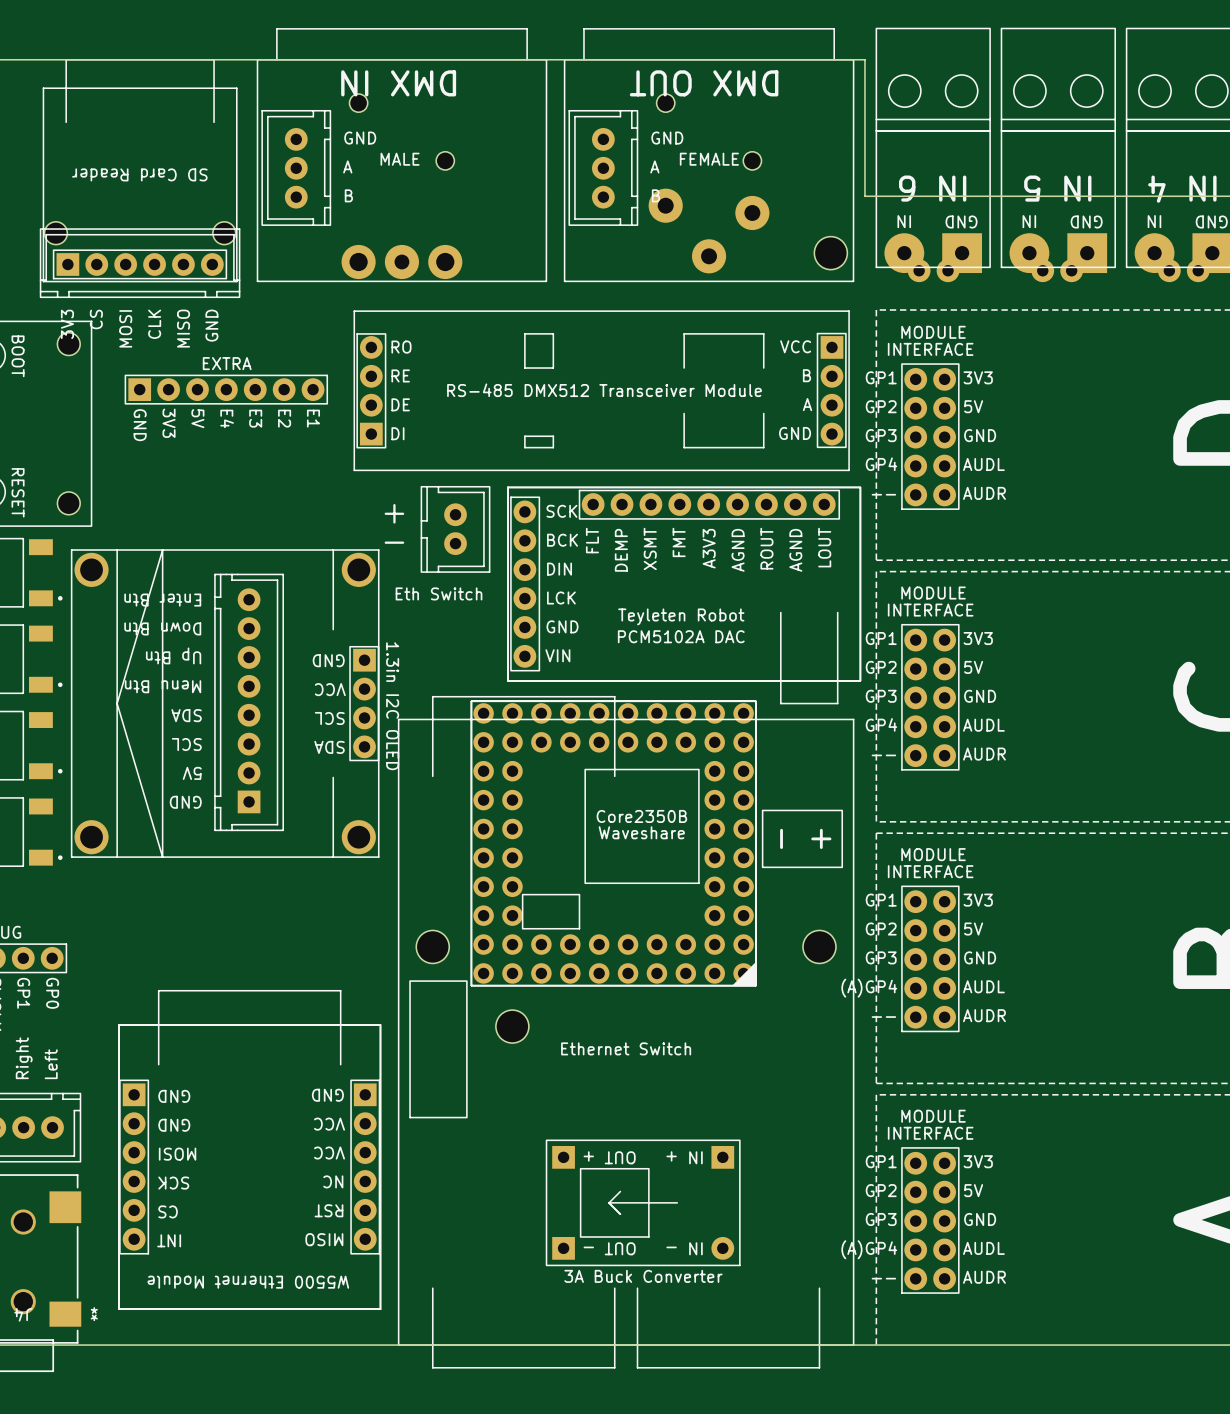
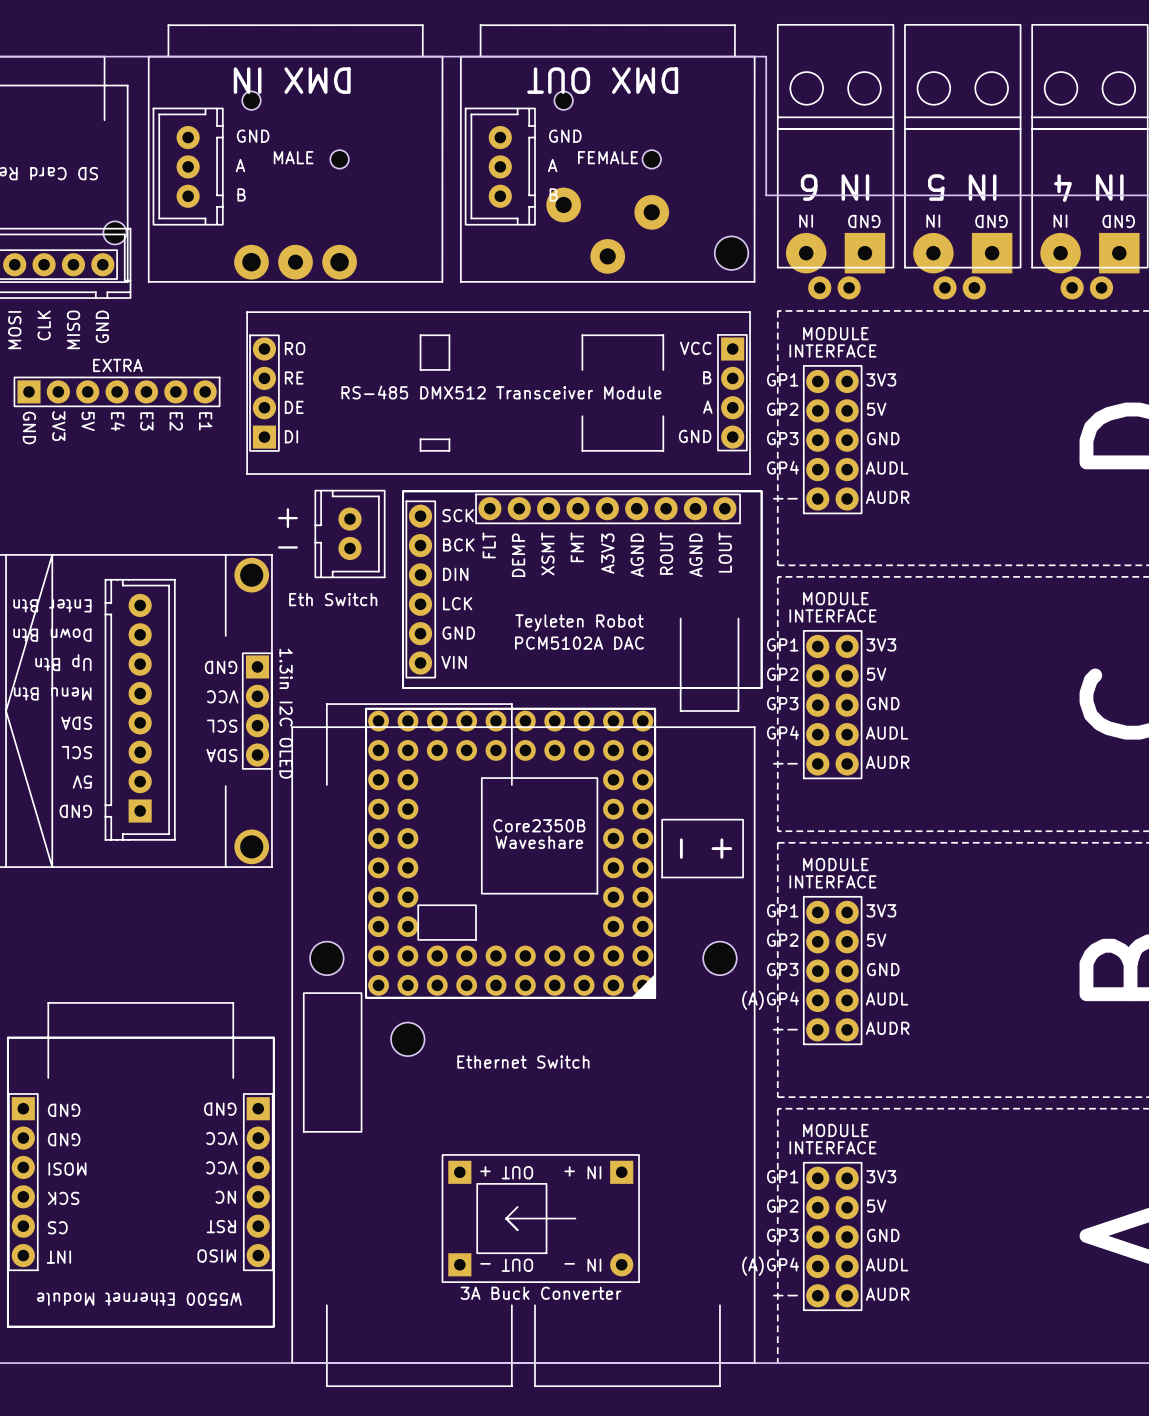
part: (919, 270) -> none
part: (948, 270) -> none
part: (1042, 270) -> none
part: (1071, 270) -> none
part: (1169, 270) -> none
part: (1198, 270) -> none
part: none -> (819, 287)
part: none -> (849, 287)
part: none -> (944, 287)
part: none -> (974, 287)
part: none -> (1072, 287)
part: none -> (1101, 287)

